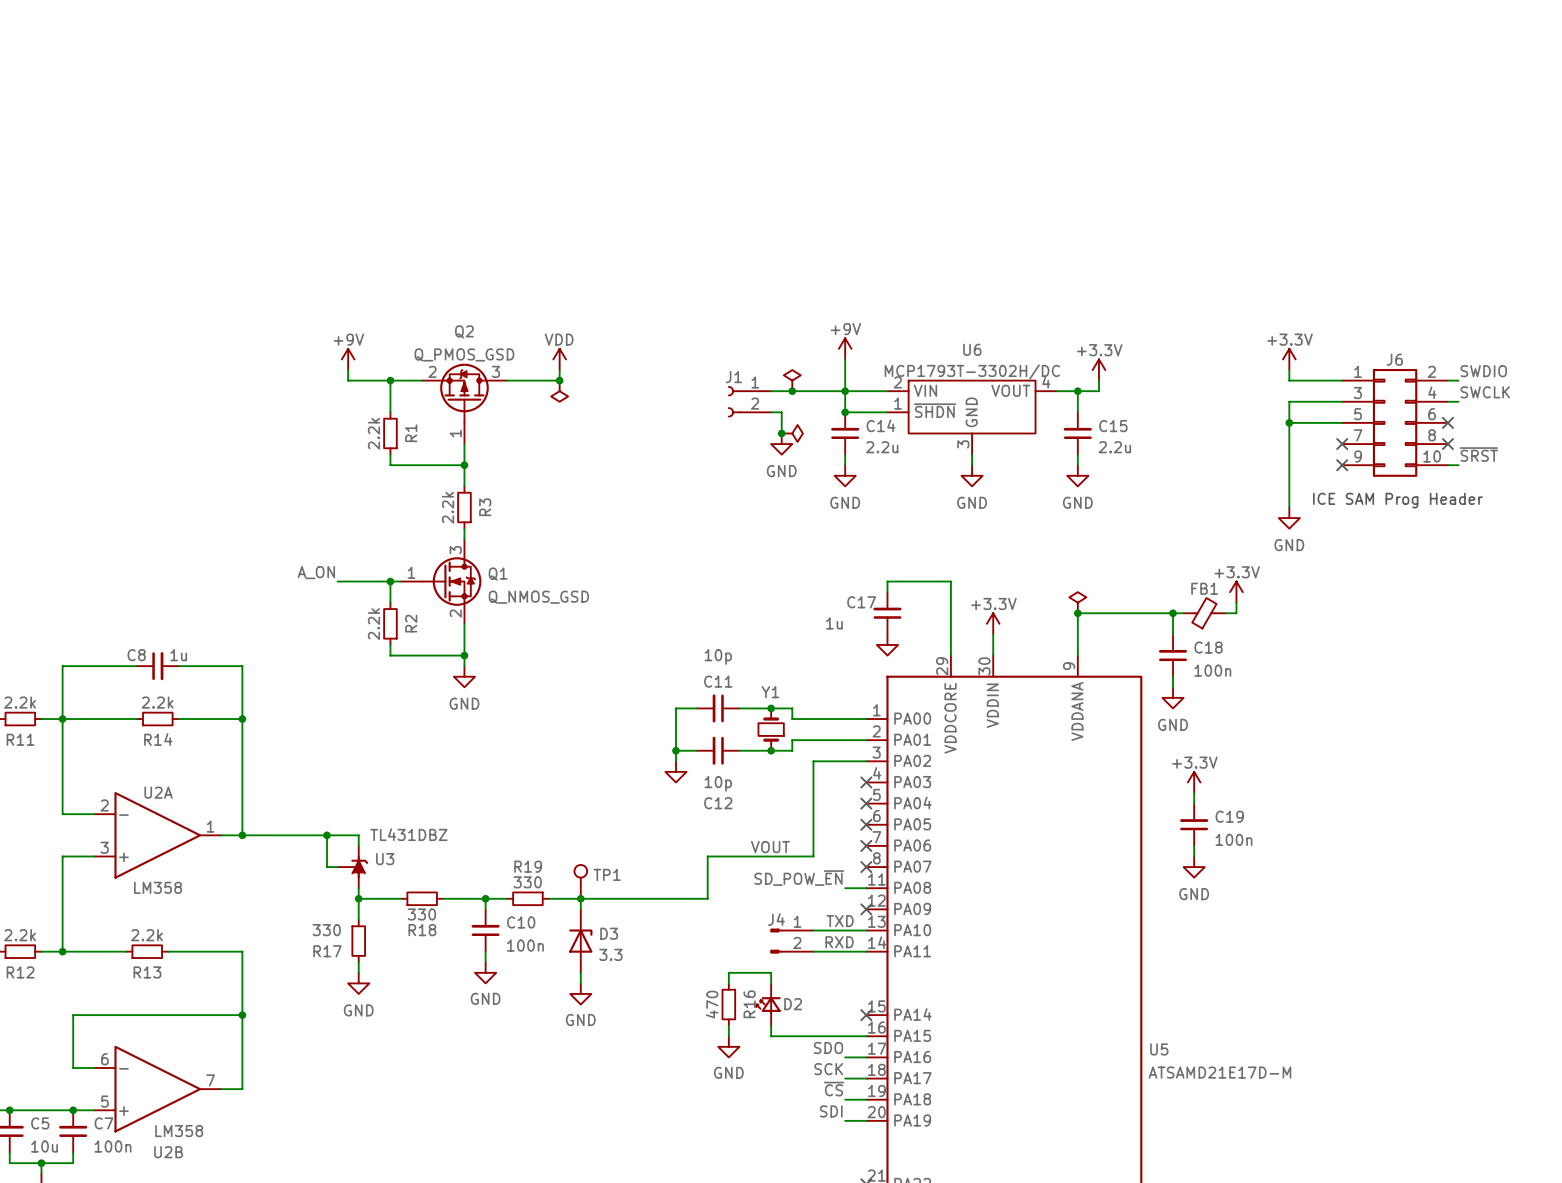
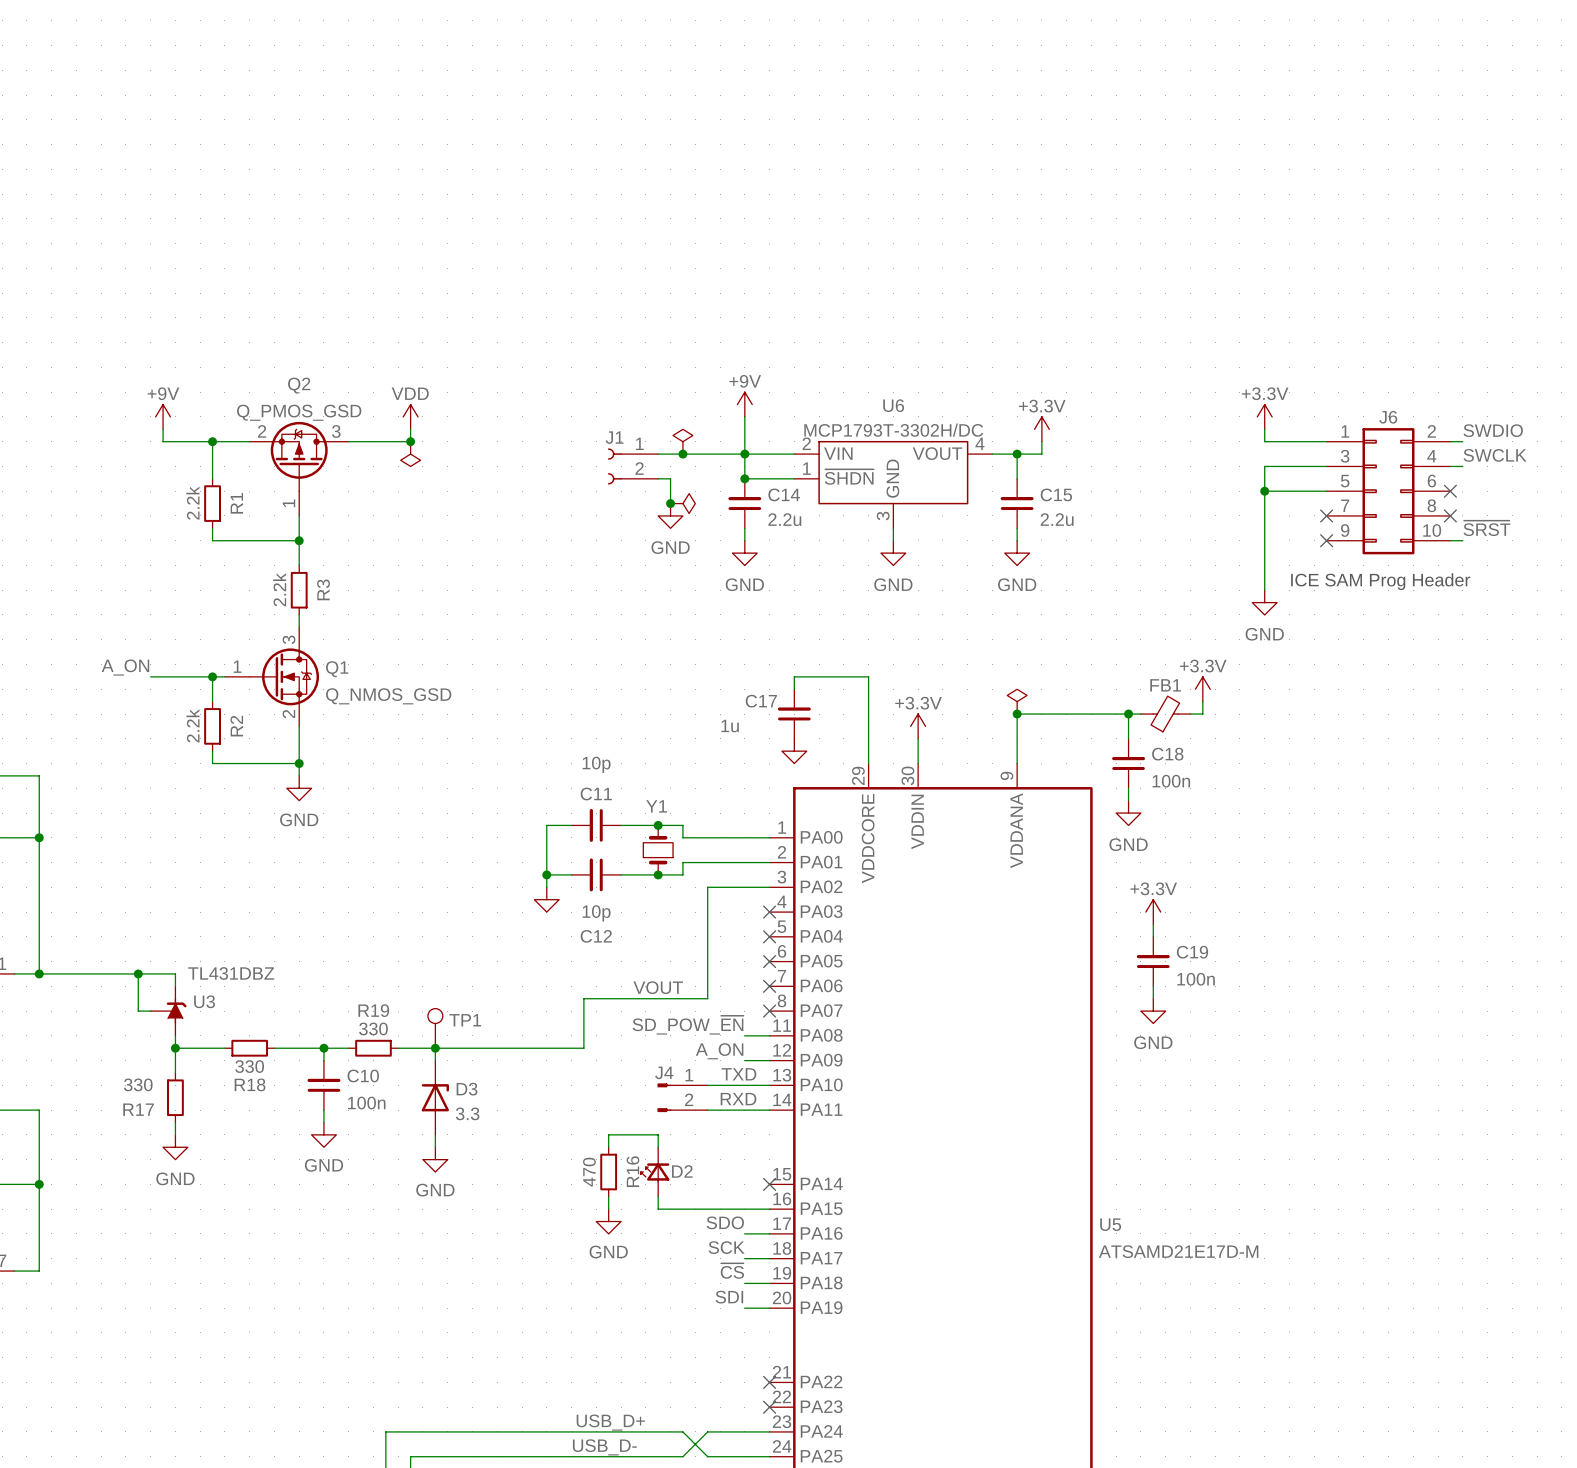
label: none -> A_ON (719, 1051)
wire: none -> (744, 1060) (769, 1060)
no-connect mark: (866, 909) -> none

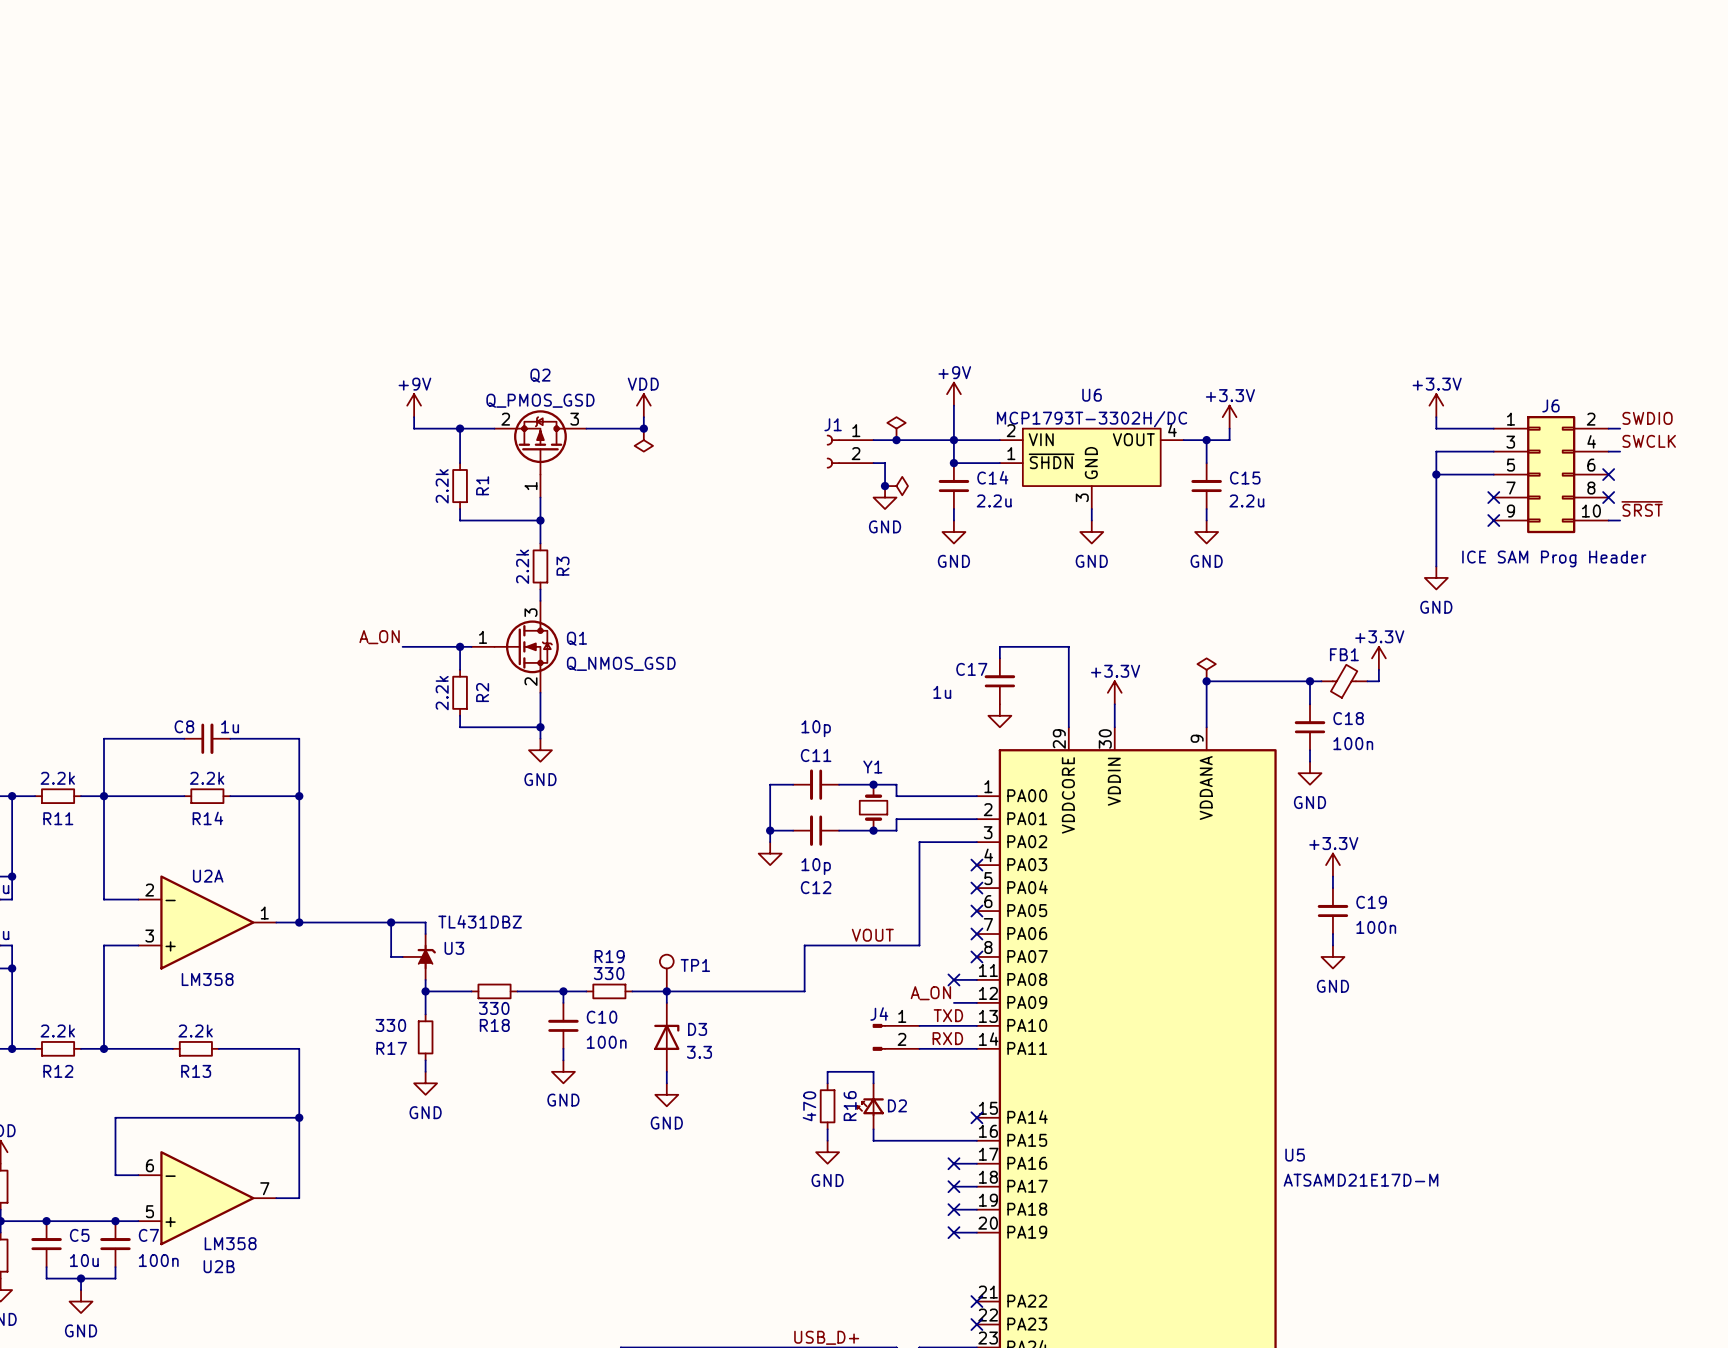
label: SD_POW_~{EN} (688, 1025) -> none
no-connect mark: none -> (953, 979)
label: SDO (725, 1222) -> none
no-connect mark: none -> (953, 1163)
label: SCK (726, 1247) -> none
no-connect mark: none -> (953, 1186)
label: ~{CS} (732, 1271) -> none
no-connect mark: none -> (953, 1209)
label: SDI (729, 1297) -> none
no-connect mark: none -> (953, 1232)

